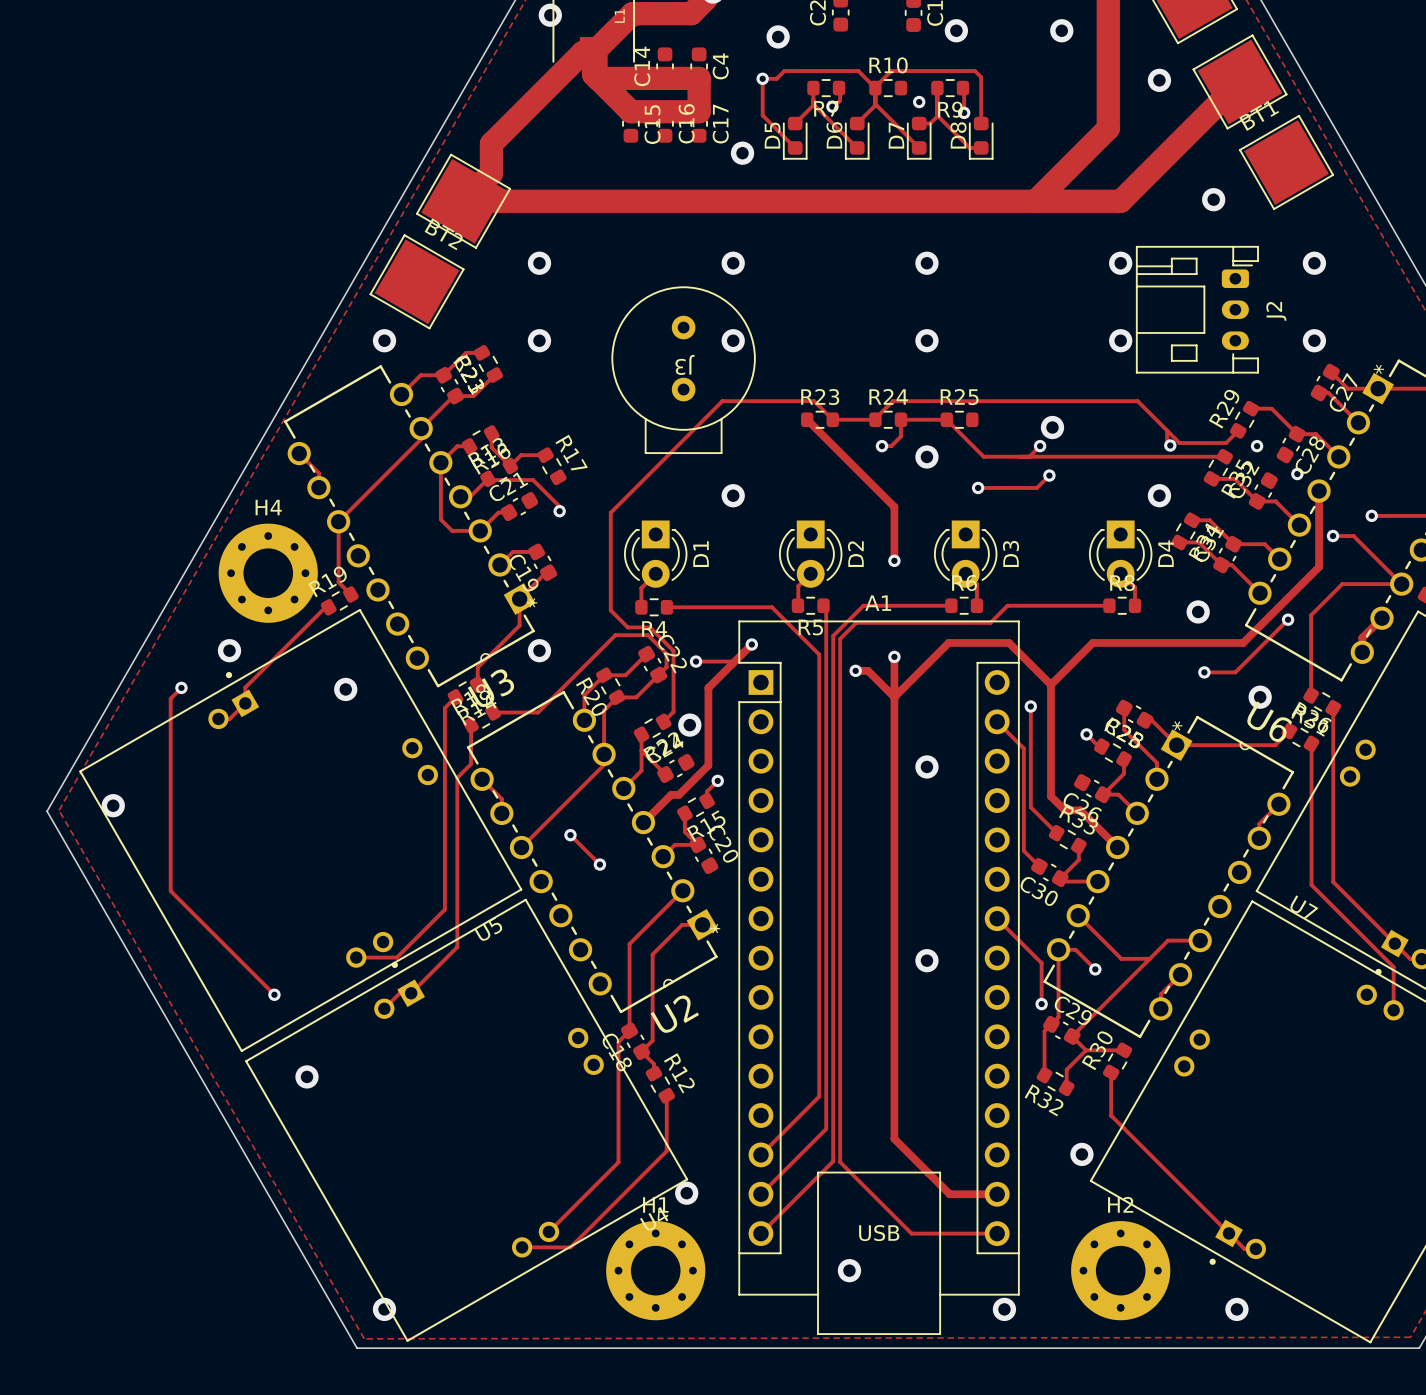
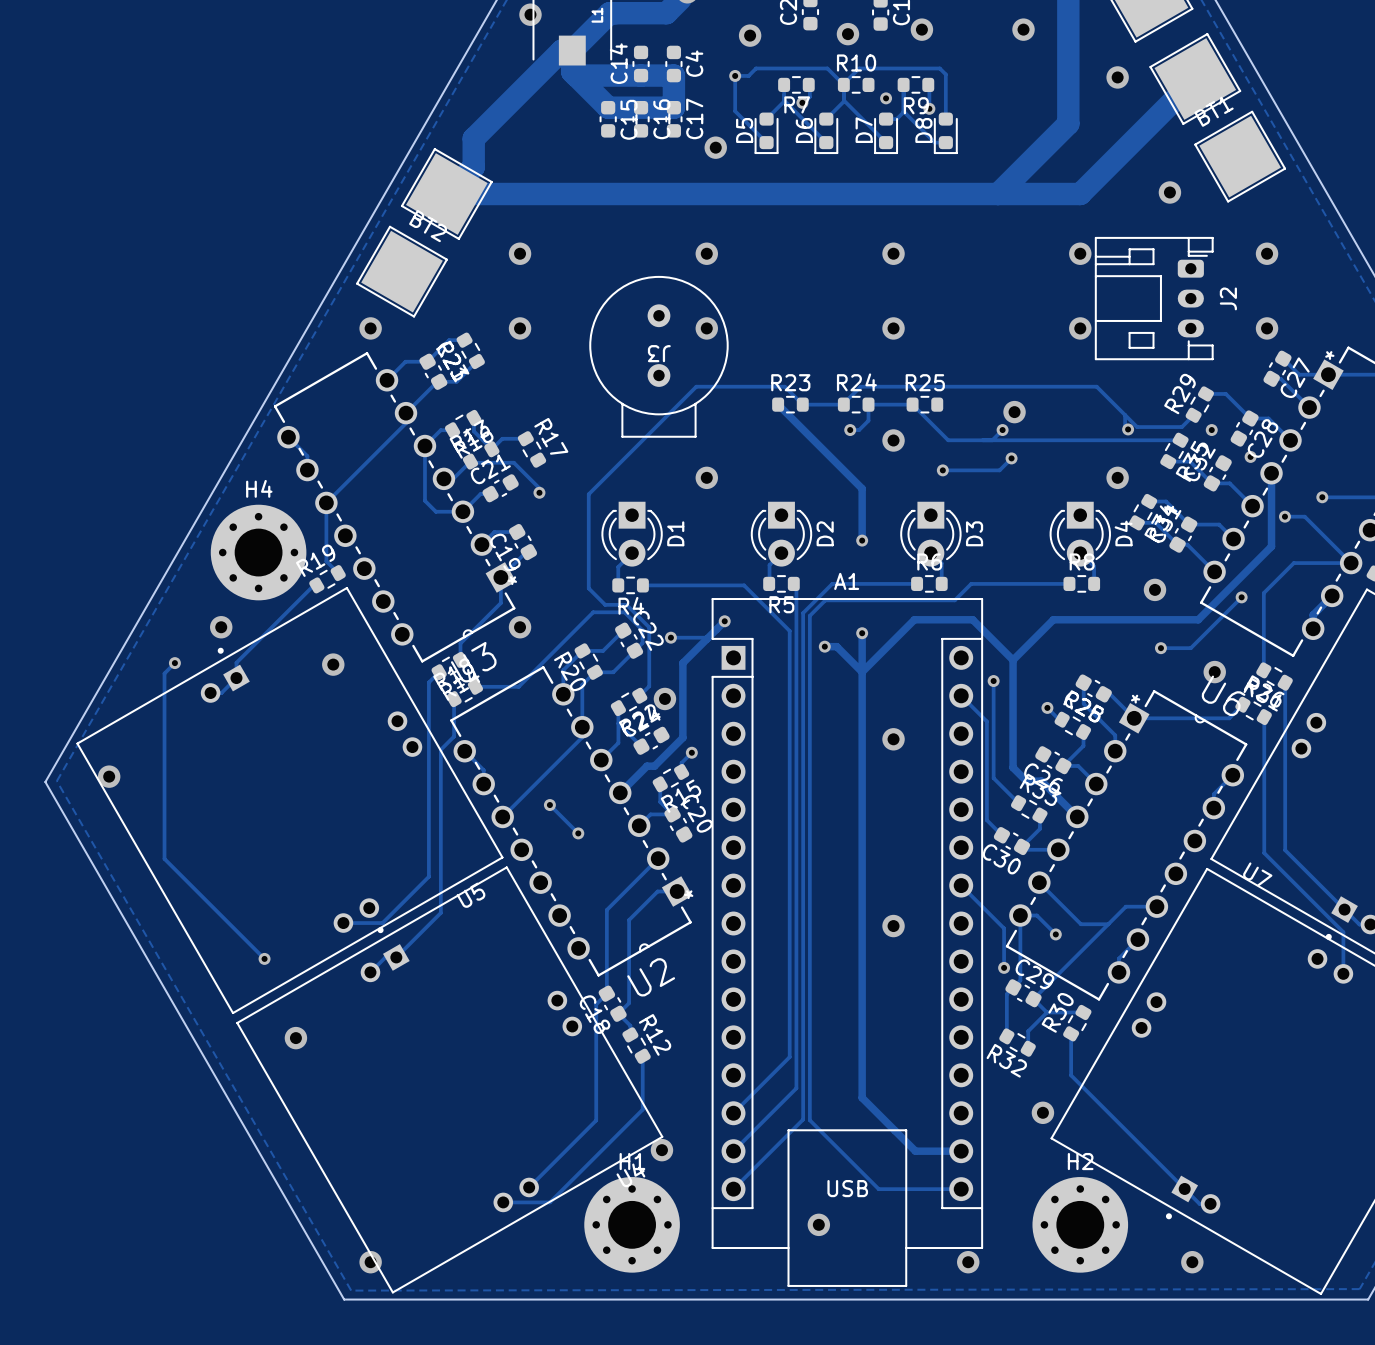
via: none -> (847, 34)

